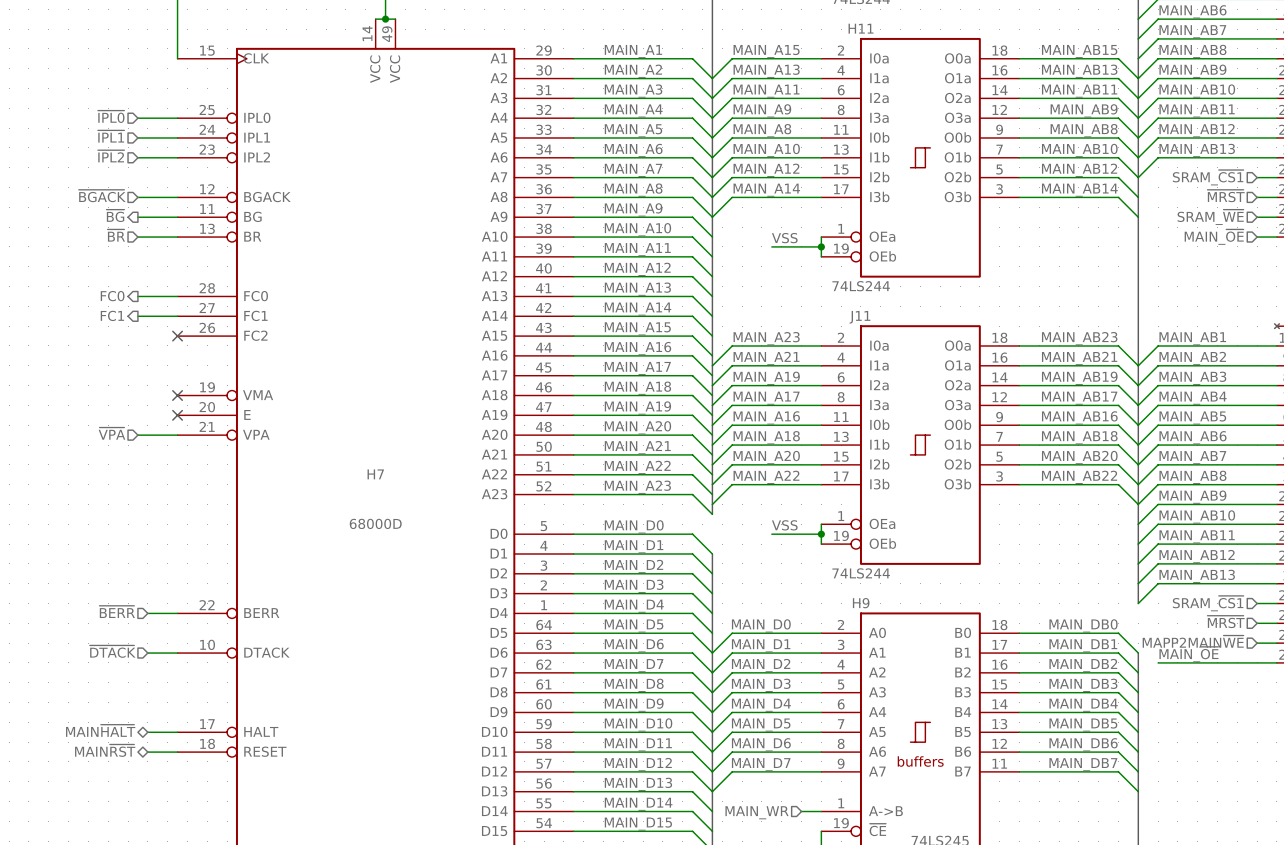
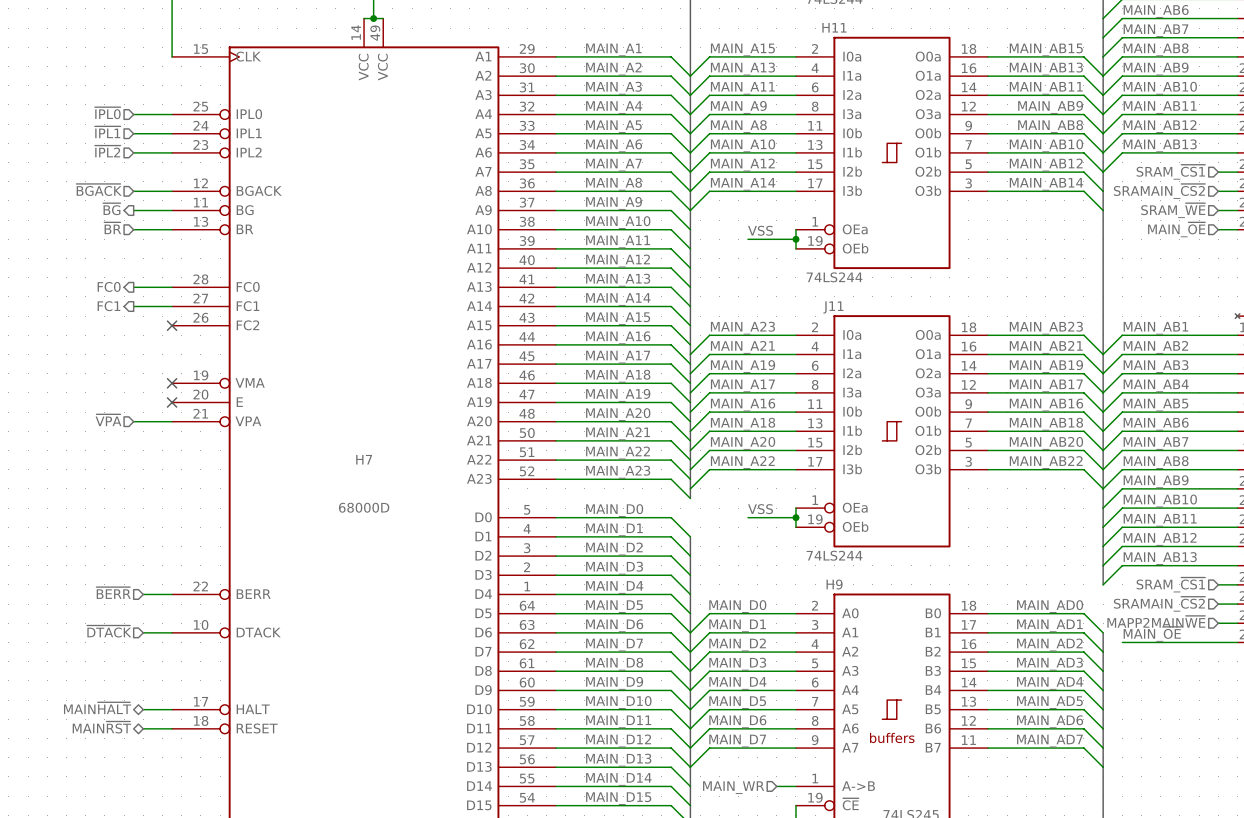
hierarchical label: ~{MRST} (1226, 196) -> SRAMAIN_~{CS2} (1159, 191)
hierarchical label: ~{MRST} (1226, 621) -> SRAMAIN_~{CS2} (1159, 604)
label: MAIN_DB0 (1083, 625) -> MAIN_AD0 (1050, 606)
label: MAIN_DB1 (1083, 645) -> MAIN_AD1 (1049, 625)
label: MAIN_DB2 (1083, 665) -> MAIN_AD2 (1049, 644)
label: MAIN_DB3 (1083, 685) -> MAIN_AD3 (1049, 664)
label: MAIN_DB4 (1083, 705) -> MAIN_AD4 (1050, 683)
label: MAIN_DB5 (1083, 725) -> MAIN_AD5 (1049, 702)
label: MAIN_DB6 (1083, 744) -> MAIN_AD6 (1050, 721)
label: MAIN_DB7 (1083, 764) -> MAIN_AD7 (1049, 741)

